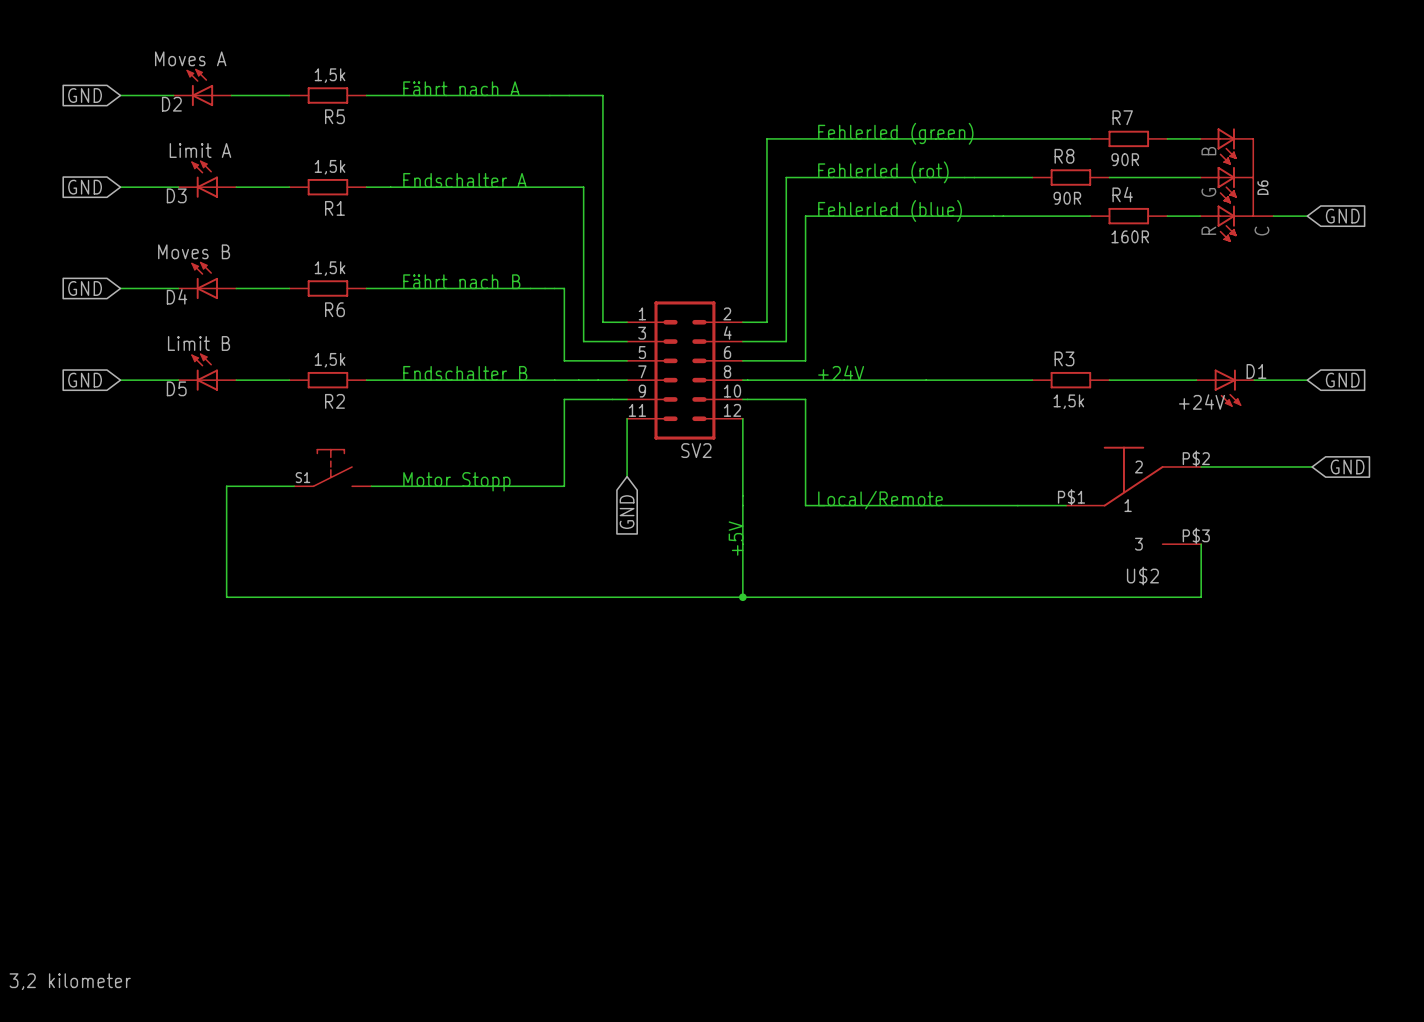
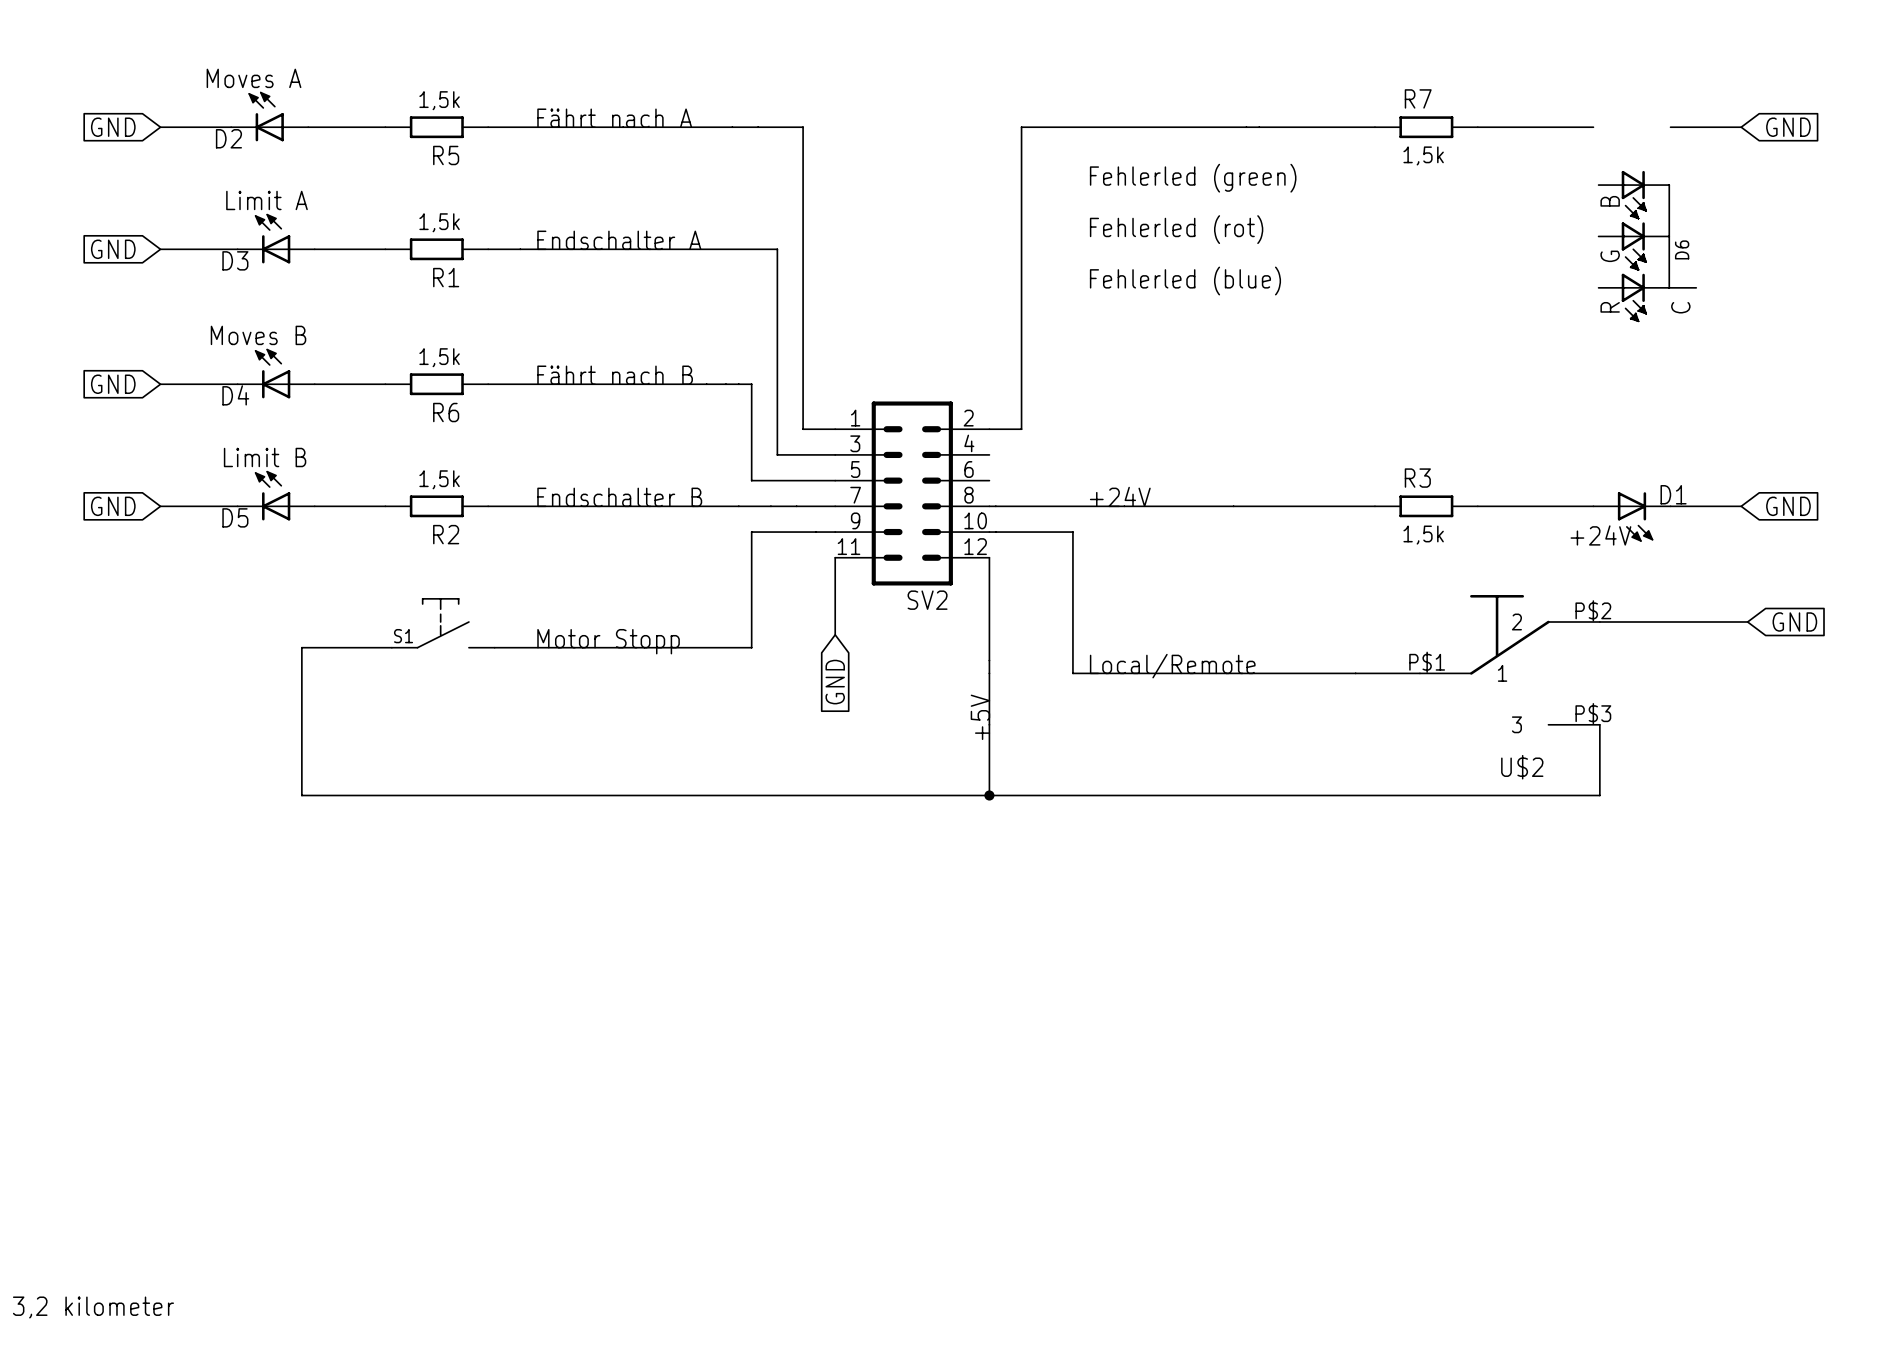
wire: none -> (1477, 127) (1593, 127)
wire: none -> (1670, 127) (1741, 127)
wire: (766, 138) (1090, 138) -> (1021, 185) (1021, 127) (1374, 127)
R7 position: (1128, 138) -> (1426, 127)
wire: (1167, 138) (1200, 138) -> none
R7 value: 90R (1125, 159) -> 1,5k (1423, 155)
wire: (1032, 177) (786, 177) (786, 341) (742, 341) -> none
R8: 90R (1070, 177) -> none
wire: (1109, 177) (1200, 177) -> none
wire: (1090, 216) (805, 216) (805, 360) (742, 360) -> none
R4: 160R (1128, 216) -> none
wire: (1167, 216) (1200, 216) -> none
wire: (1273, 216) (1307, 216) -> none
global label position: GND (1342, 216) -> GND (1788, 127)

